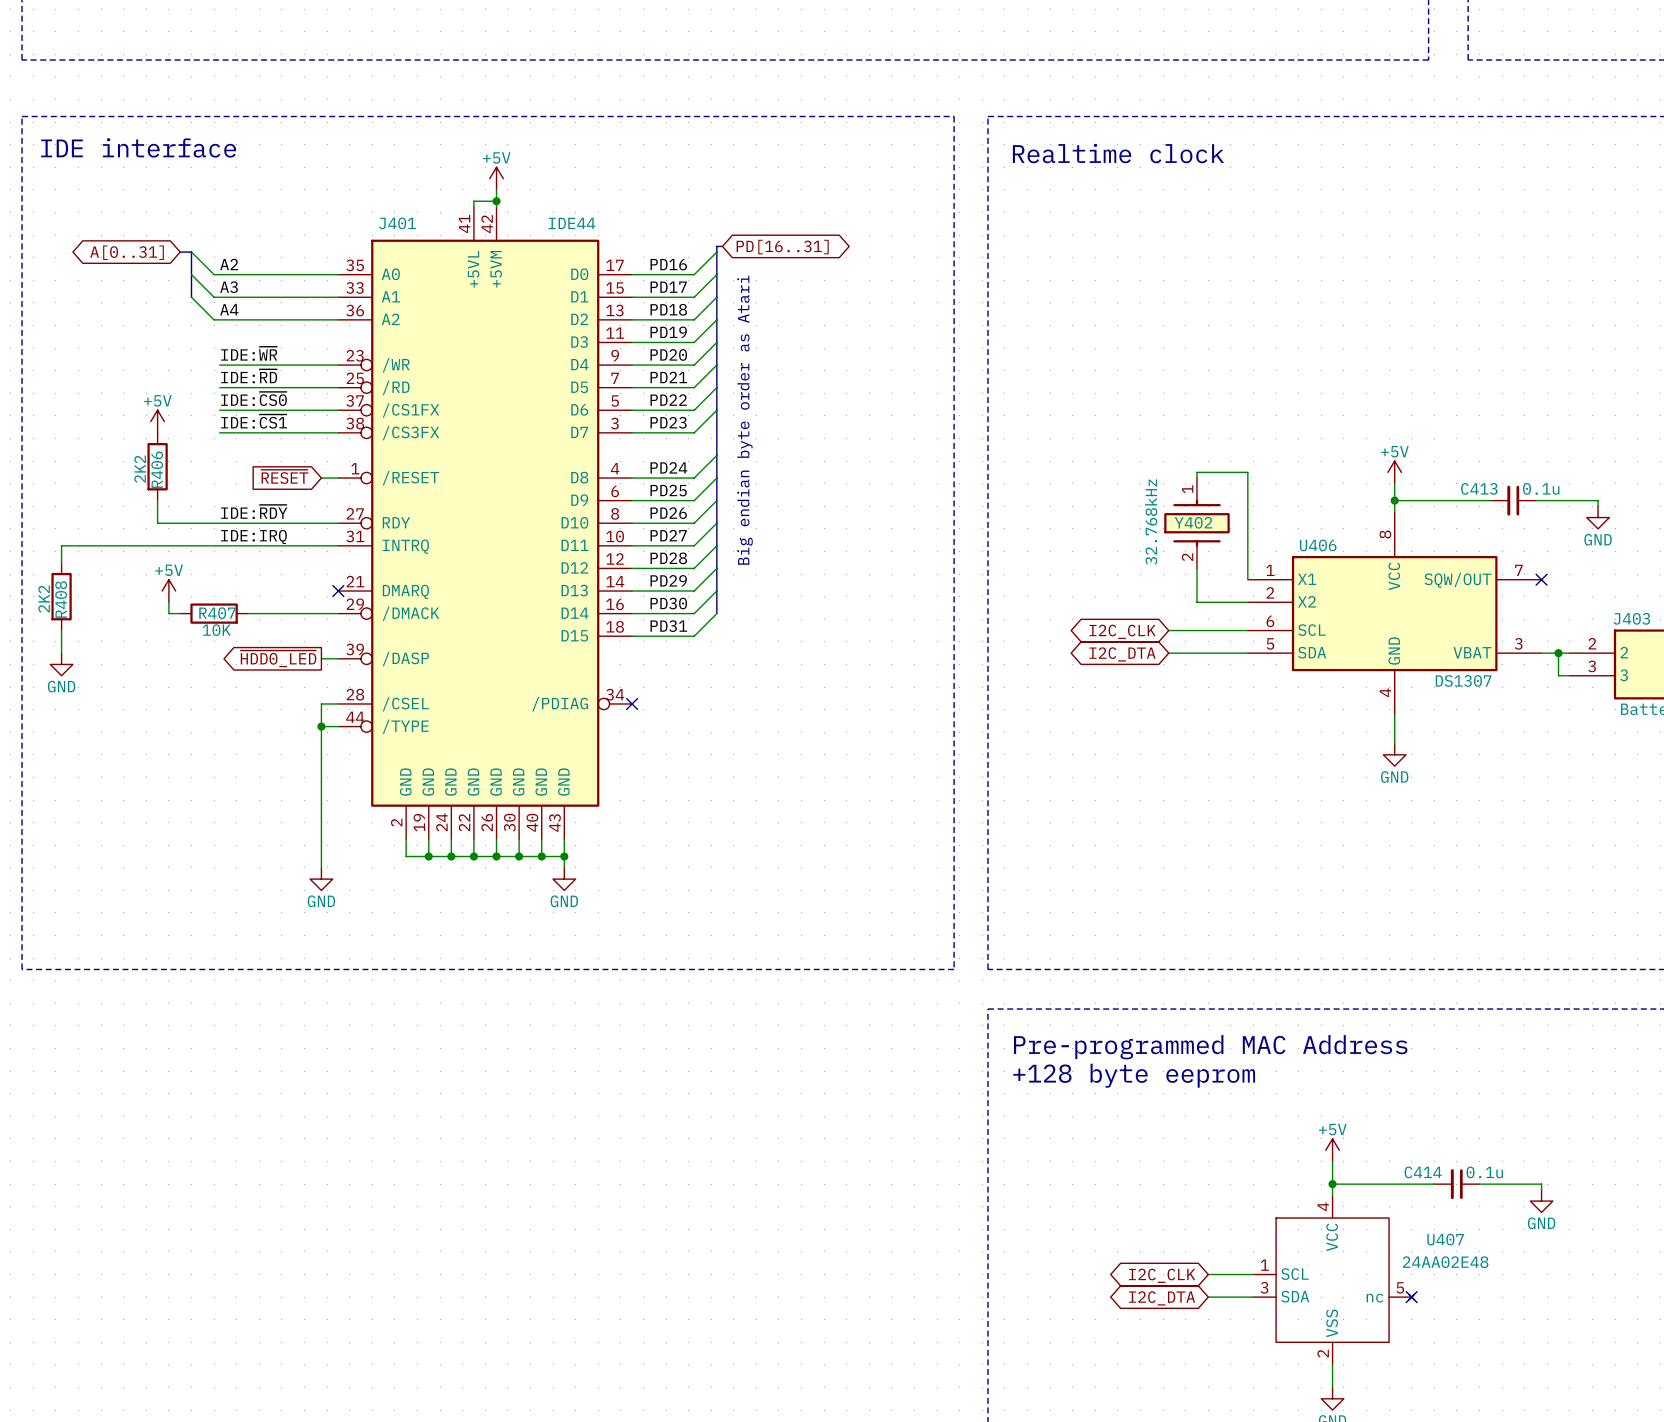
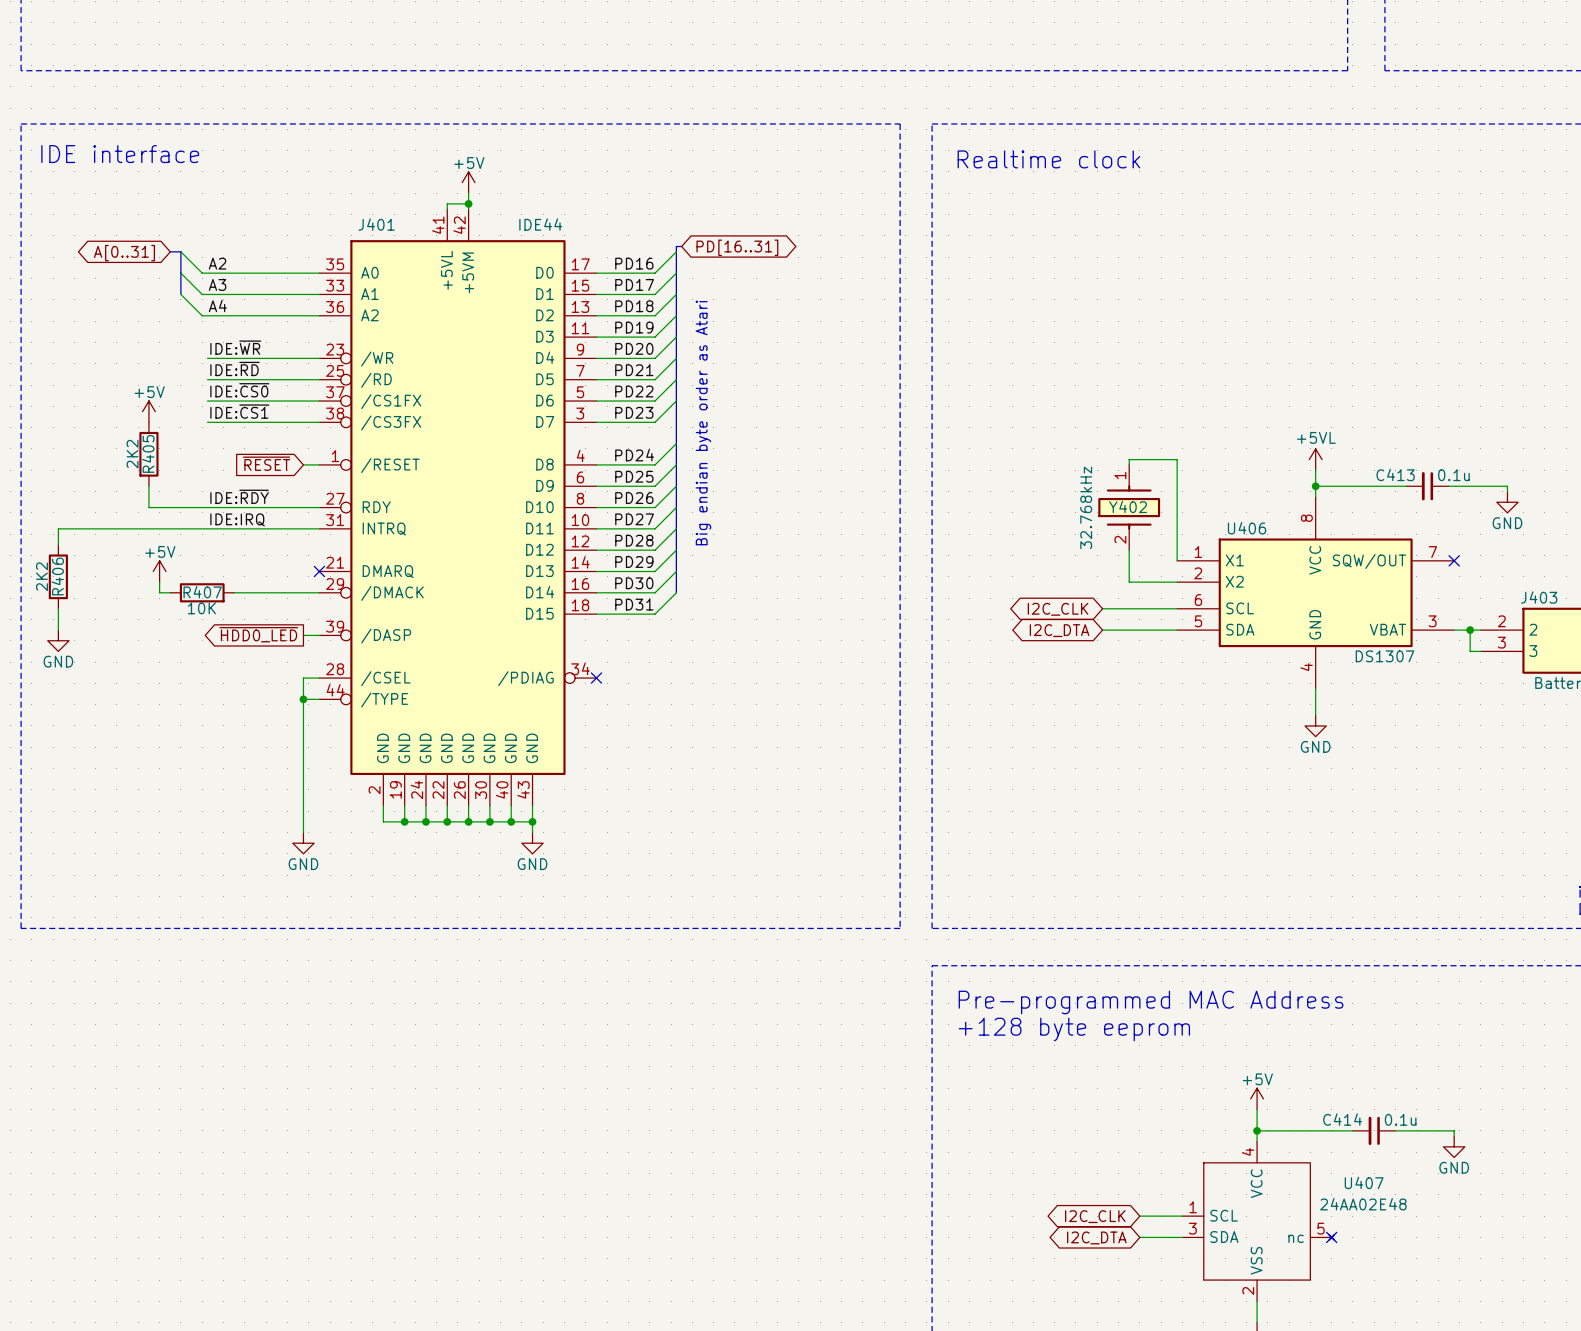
R406 name: R406 (157, 469) -> R405 (148, 453)
power symbol: +5V (1394, 472) -> +5VL (1315, 459)
R408 name: R408 (61, 599) -> R406 (57, 576)

